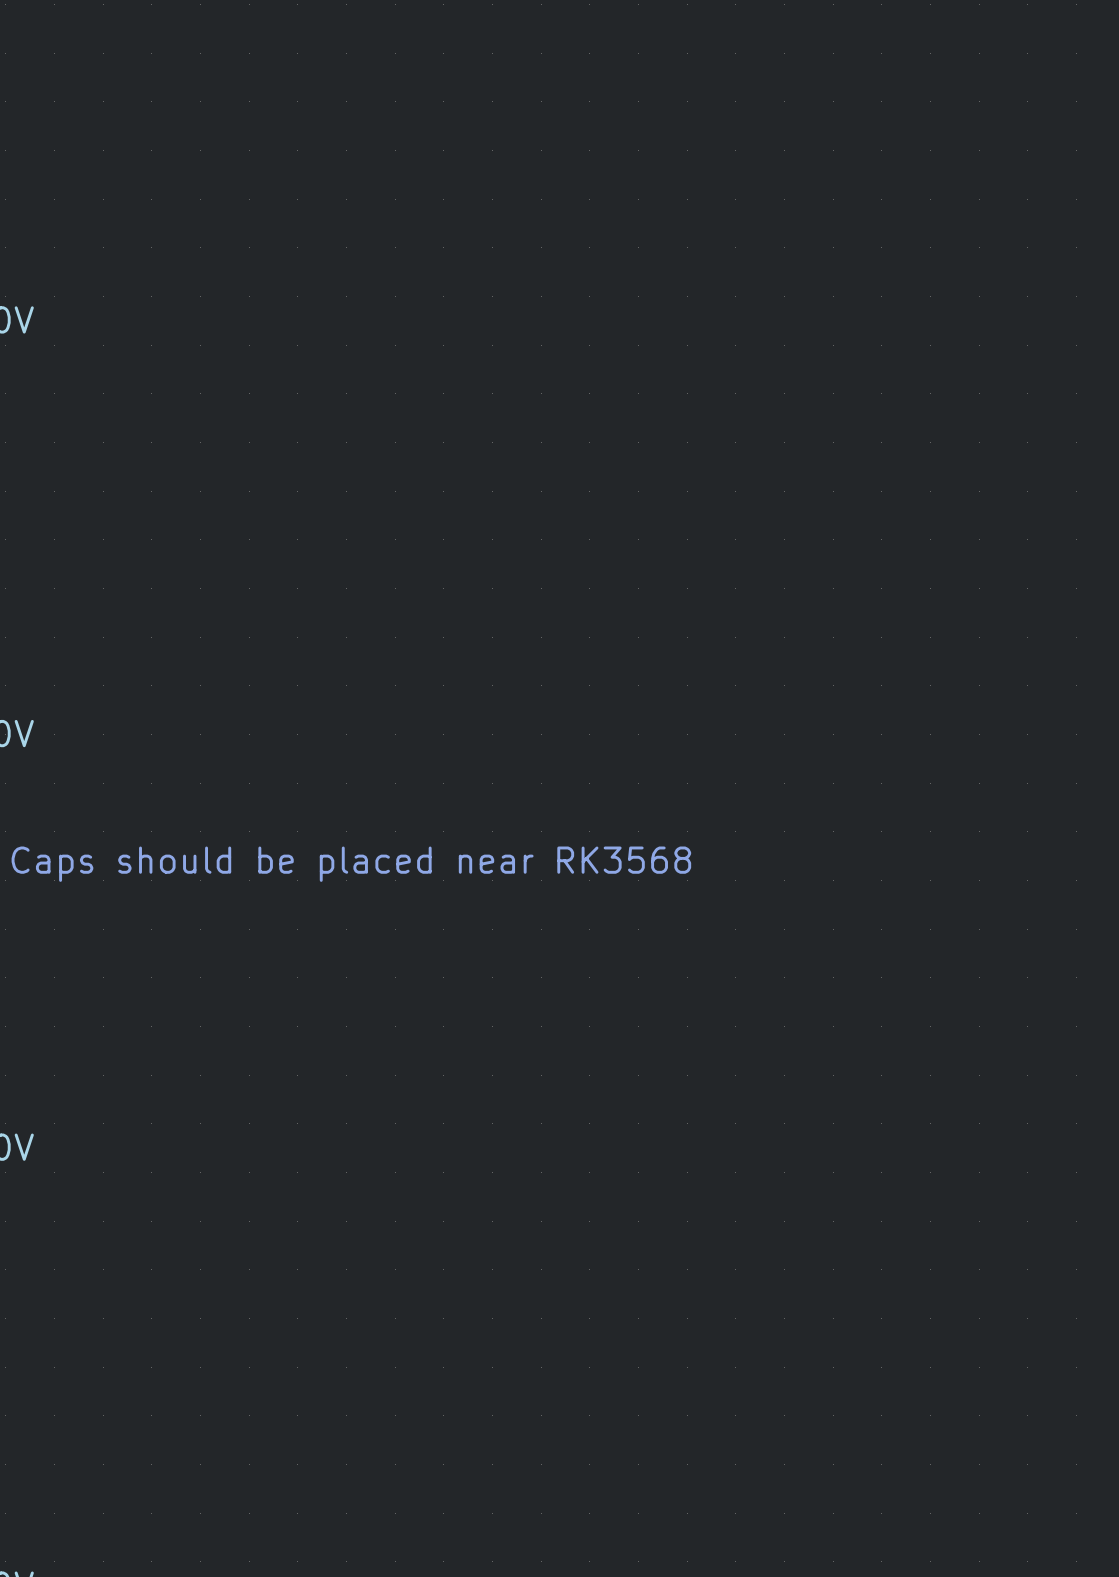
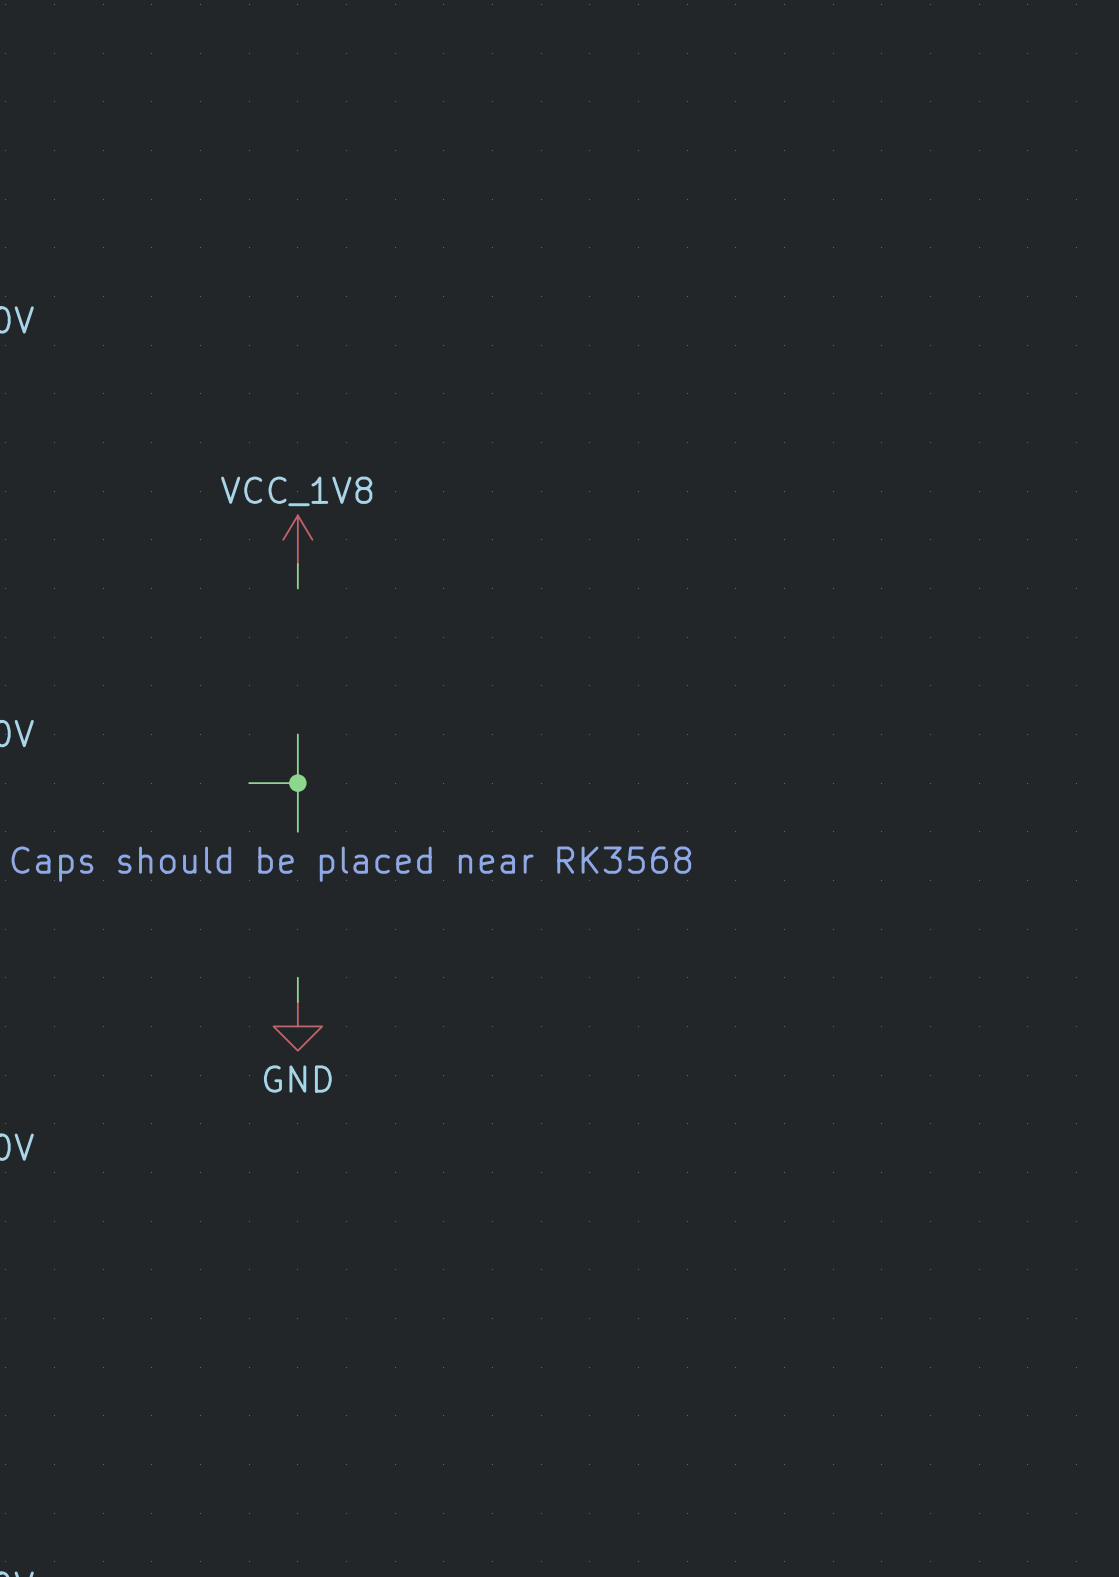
power symbol: none -> VCC_1V8 (297, 539)
wire: none -> (297, 564) (297, 588)
wire: none -> (297, 734) (297, 831)
wire: none -> (249, 783) (297, 783)
junction: none -> (297, 783)
wire: none -> (297, 977) (297, 1002)
power symbol: none -> GND (297, 1026)

